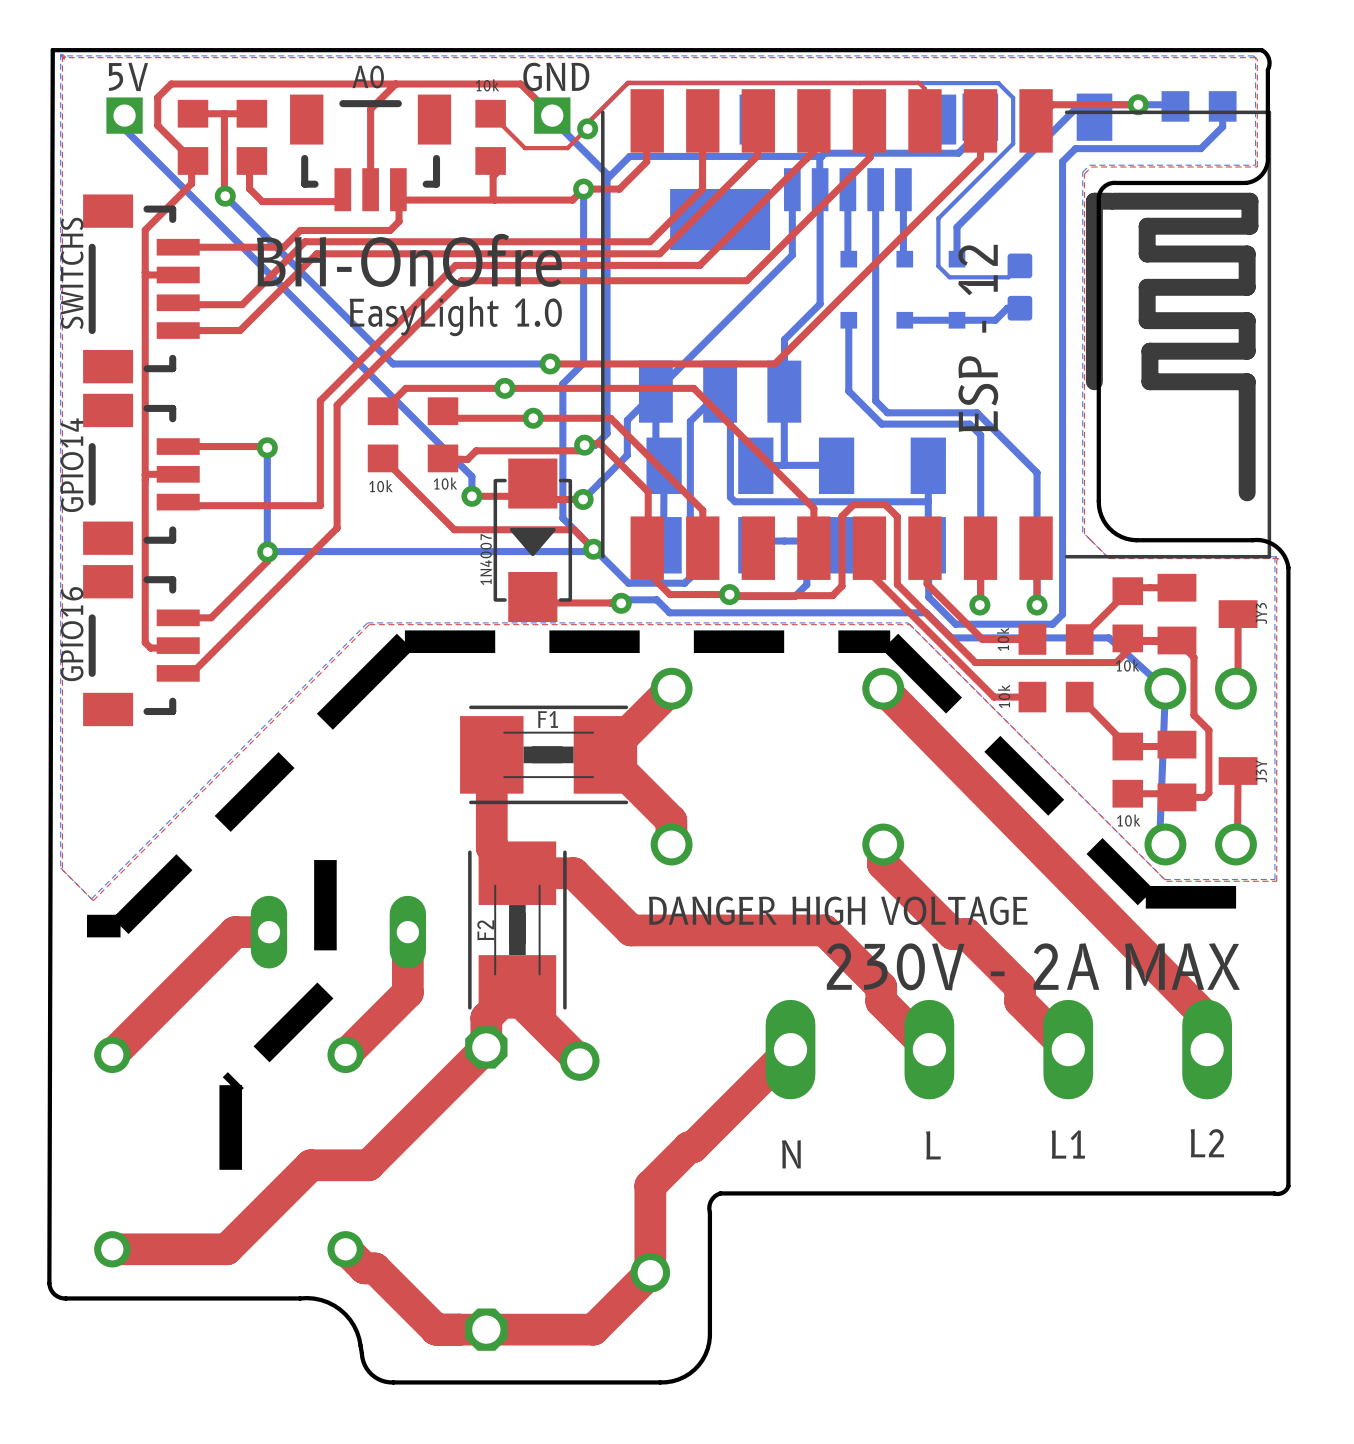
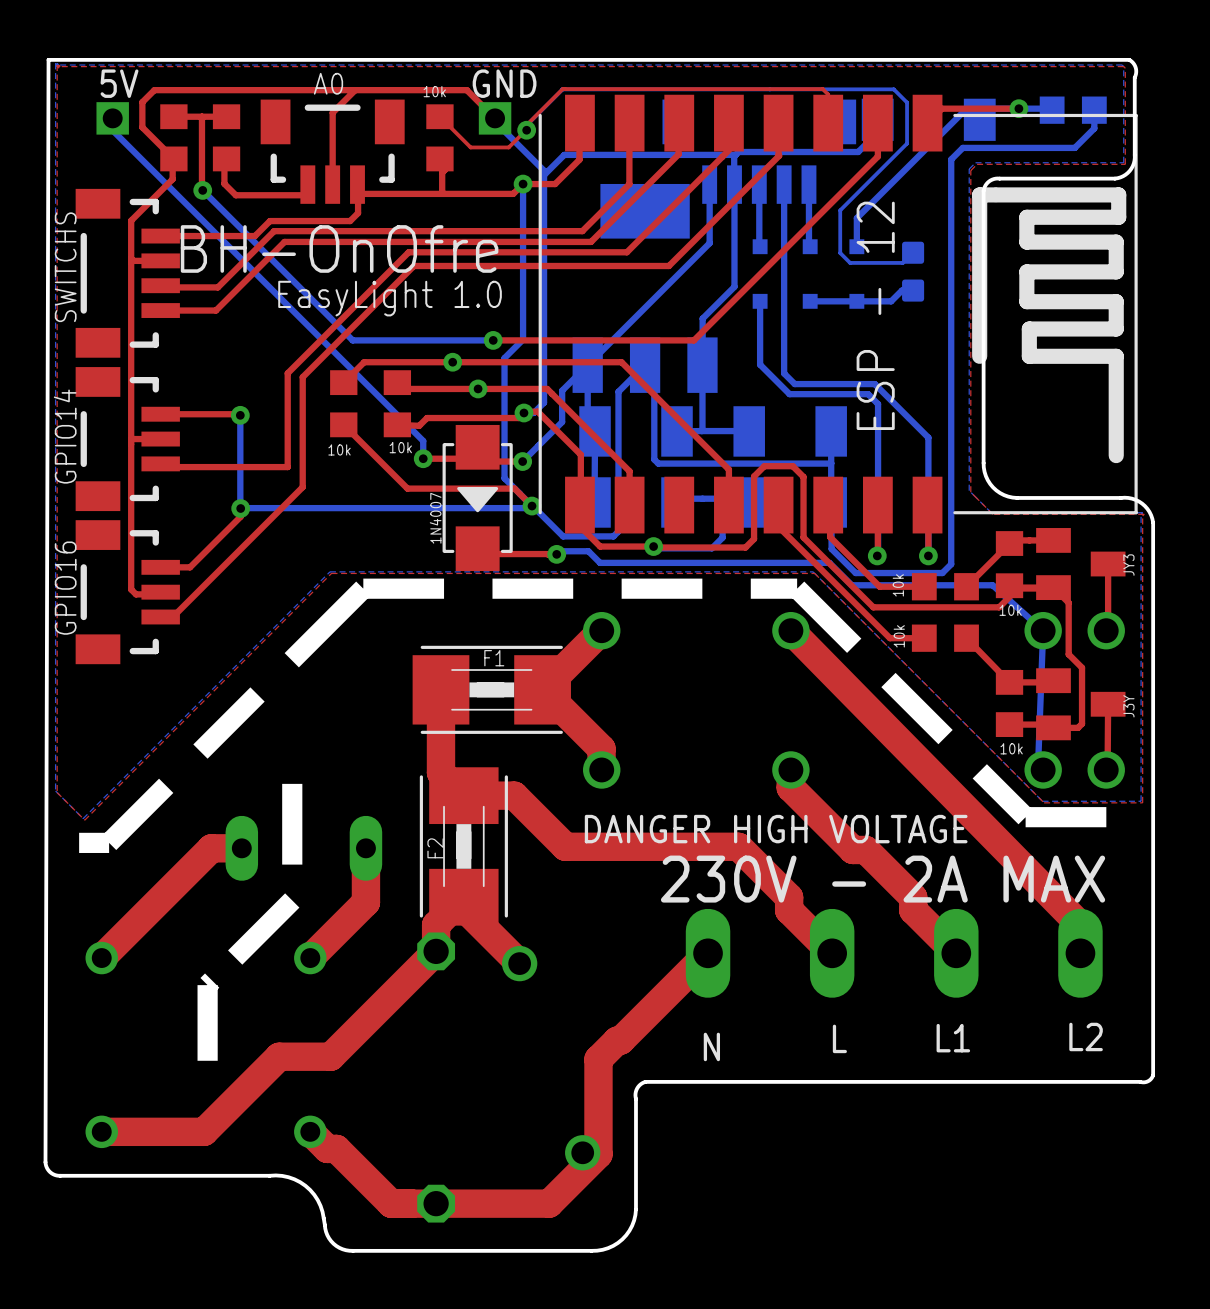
top track: (667, 1168) (650, 1185) (650, 1272) (593, 1329) -> (598, 1059) (598, 1154) (549, 1203) (531, 1203)

